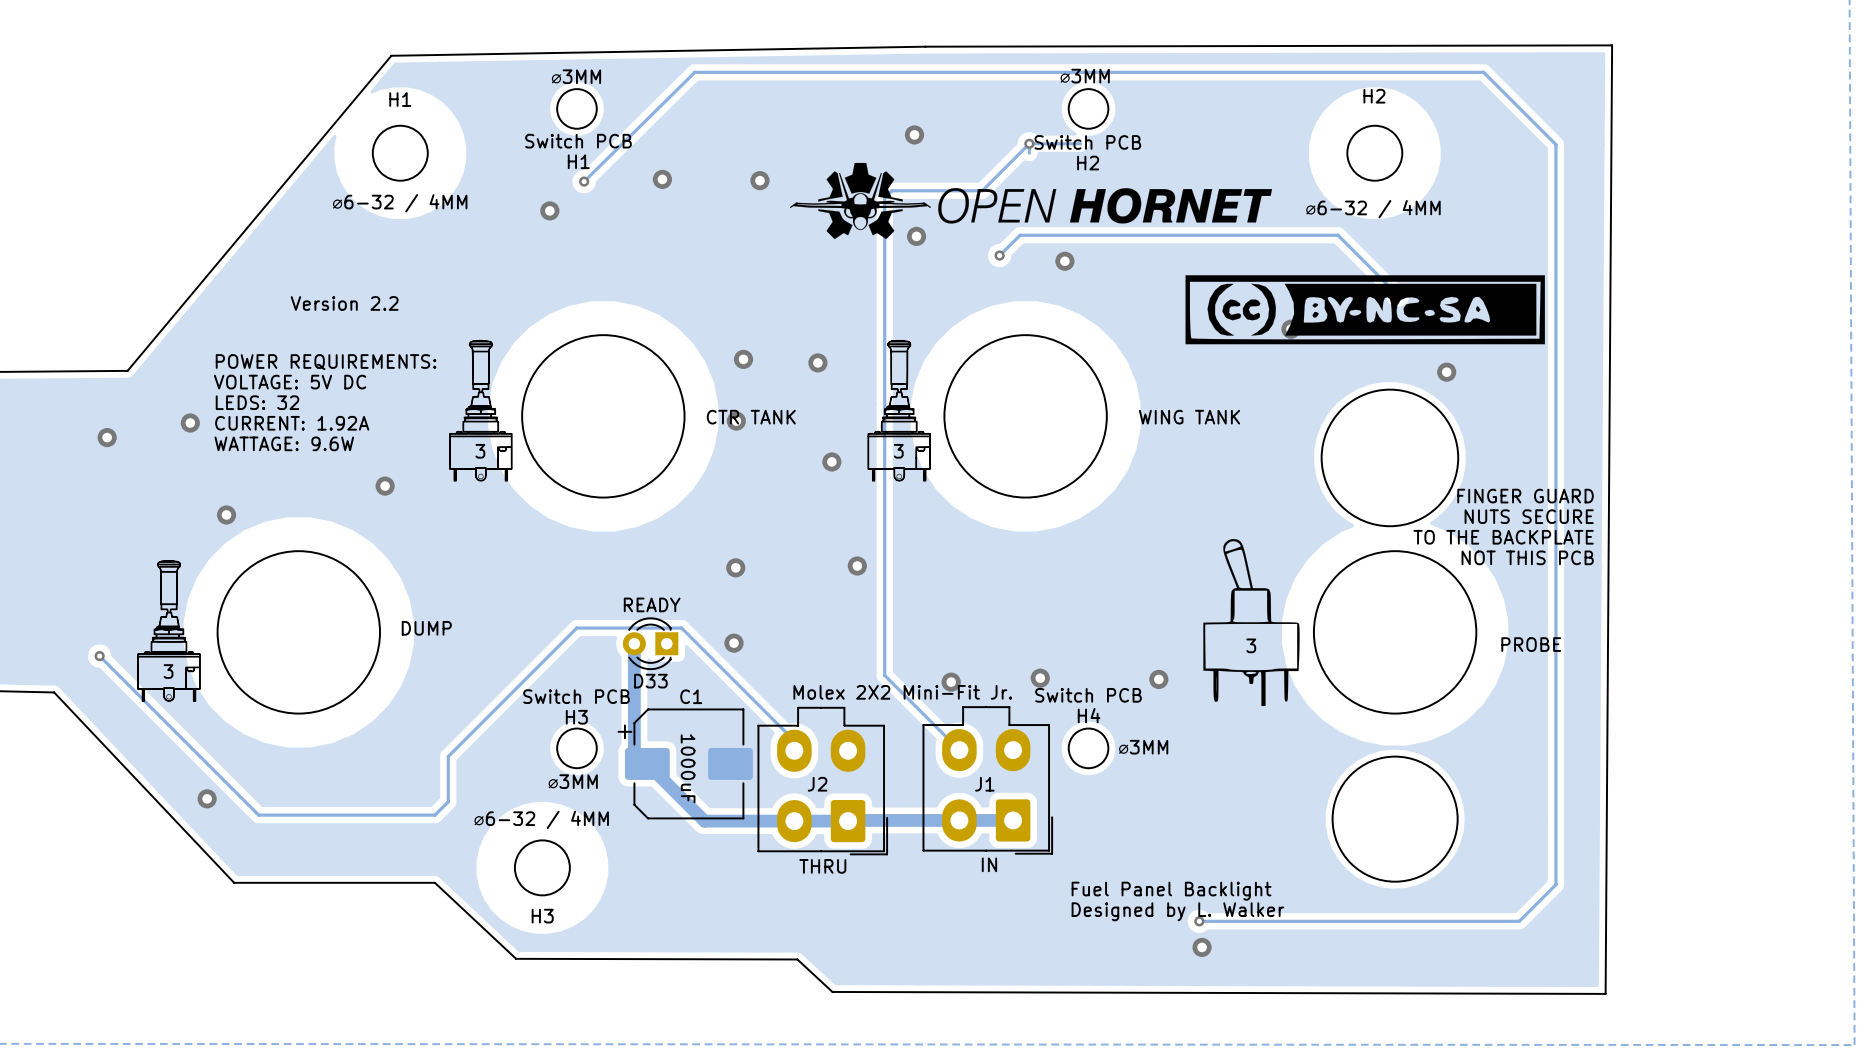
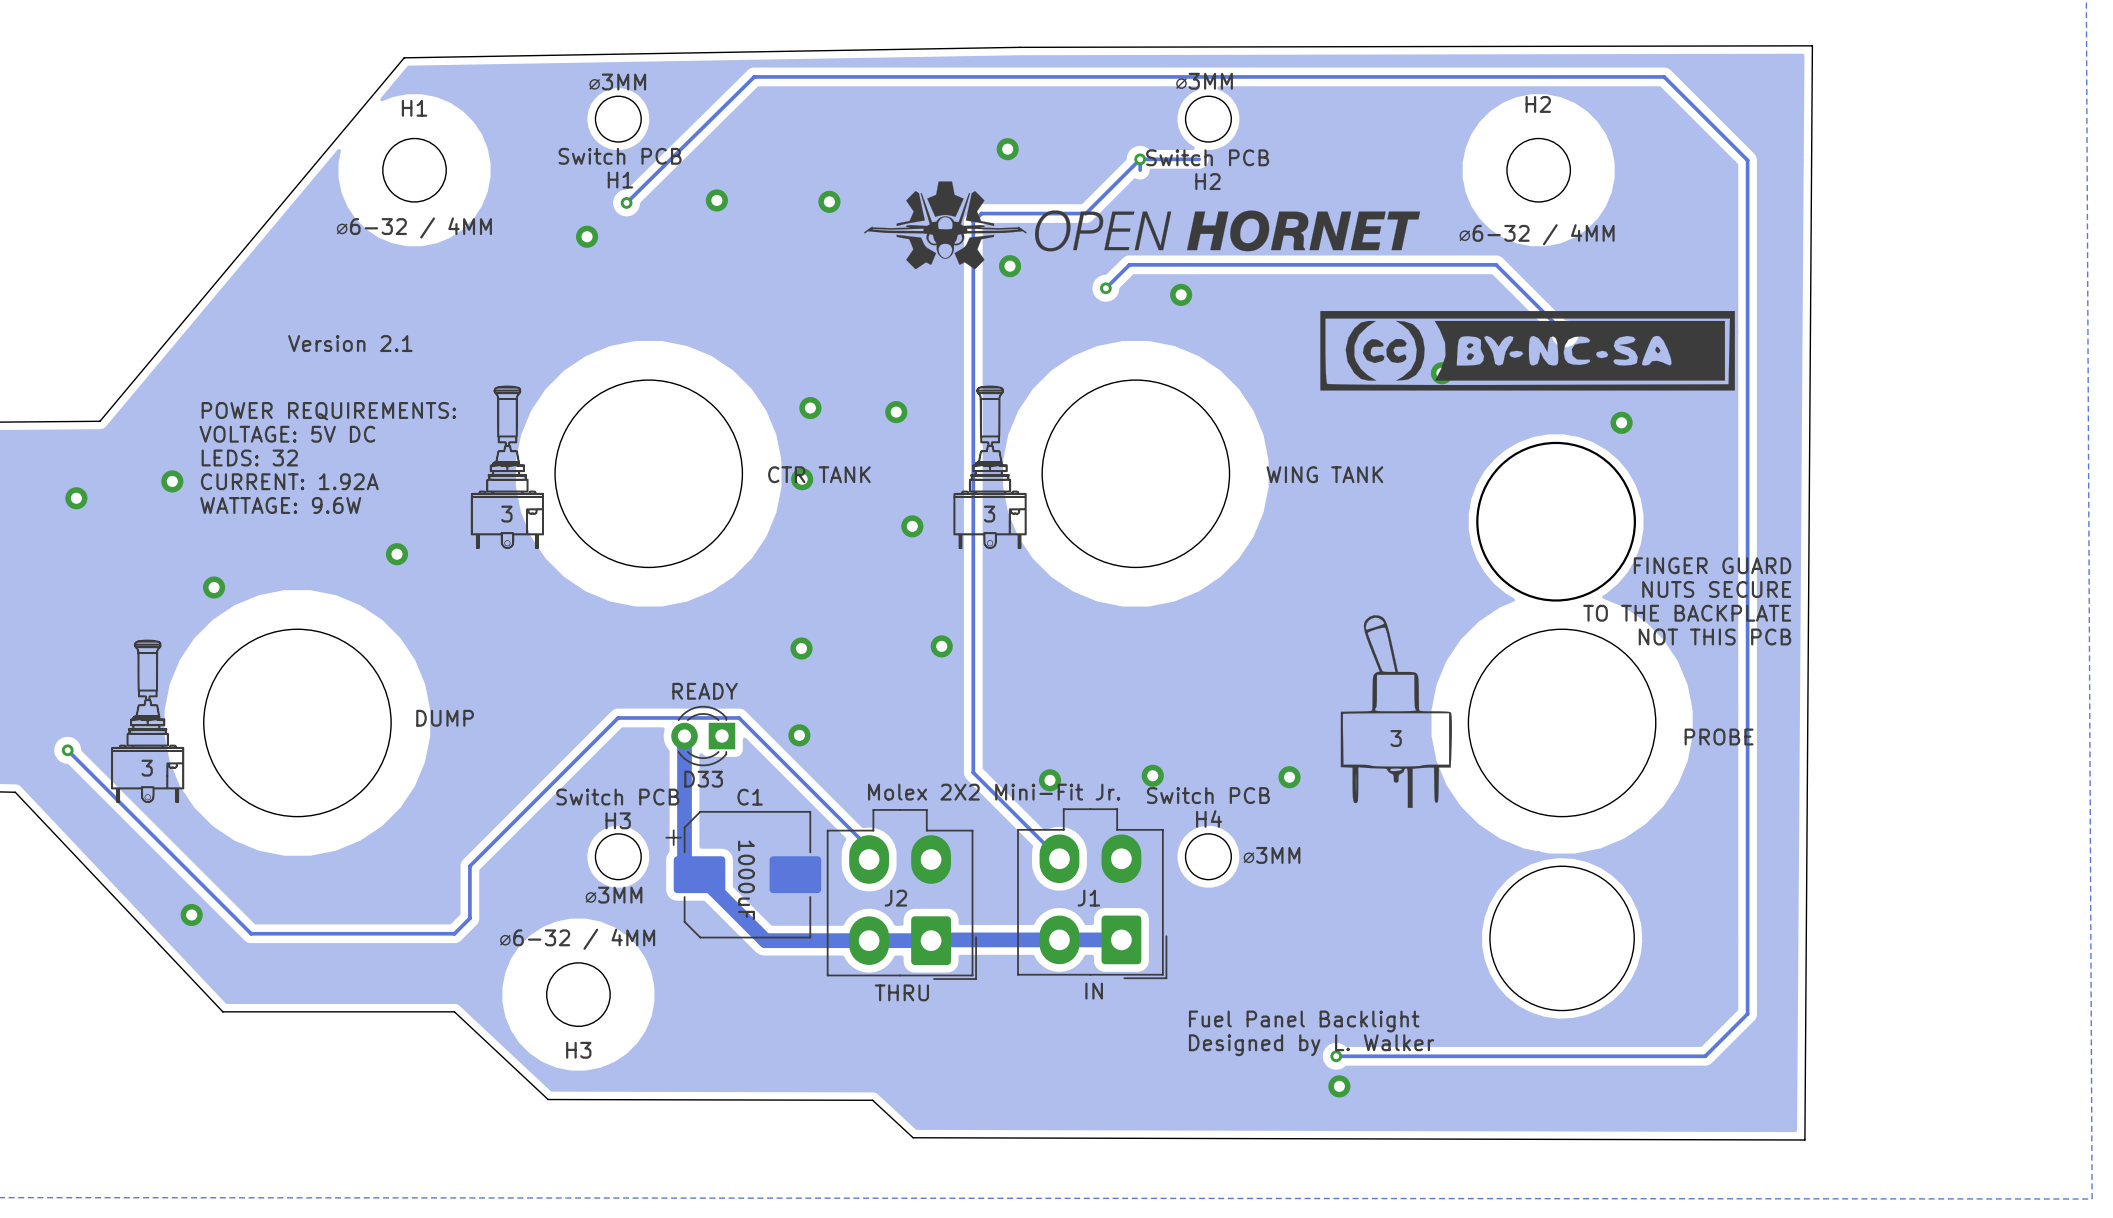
text: Version 2.2 (344, 303) -> Version 2.1 (350, 343)

